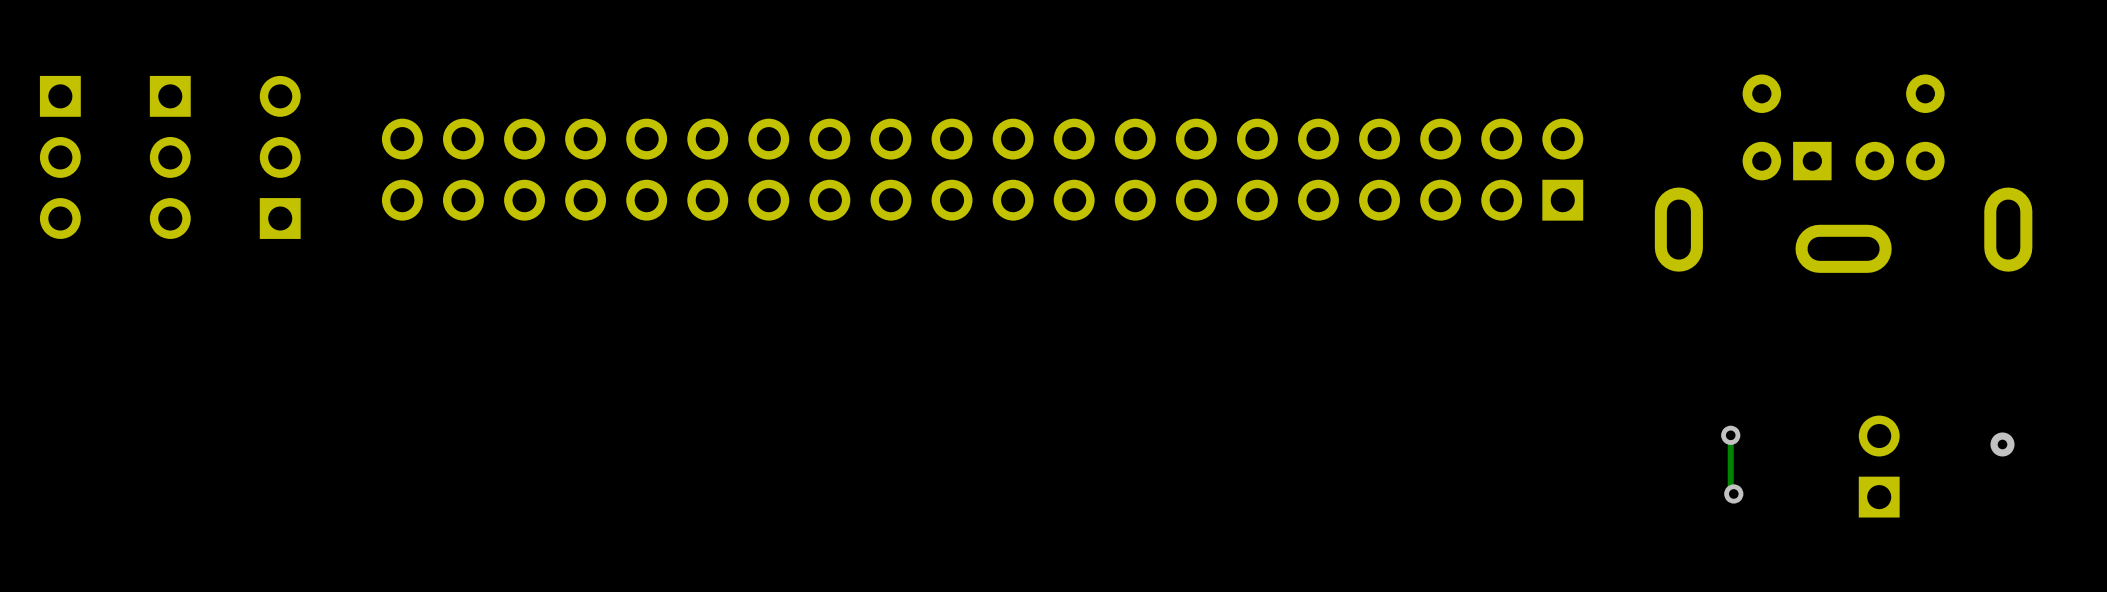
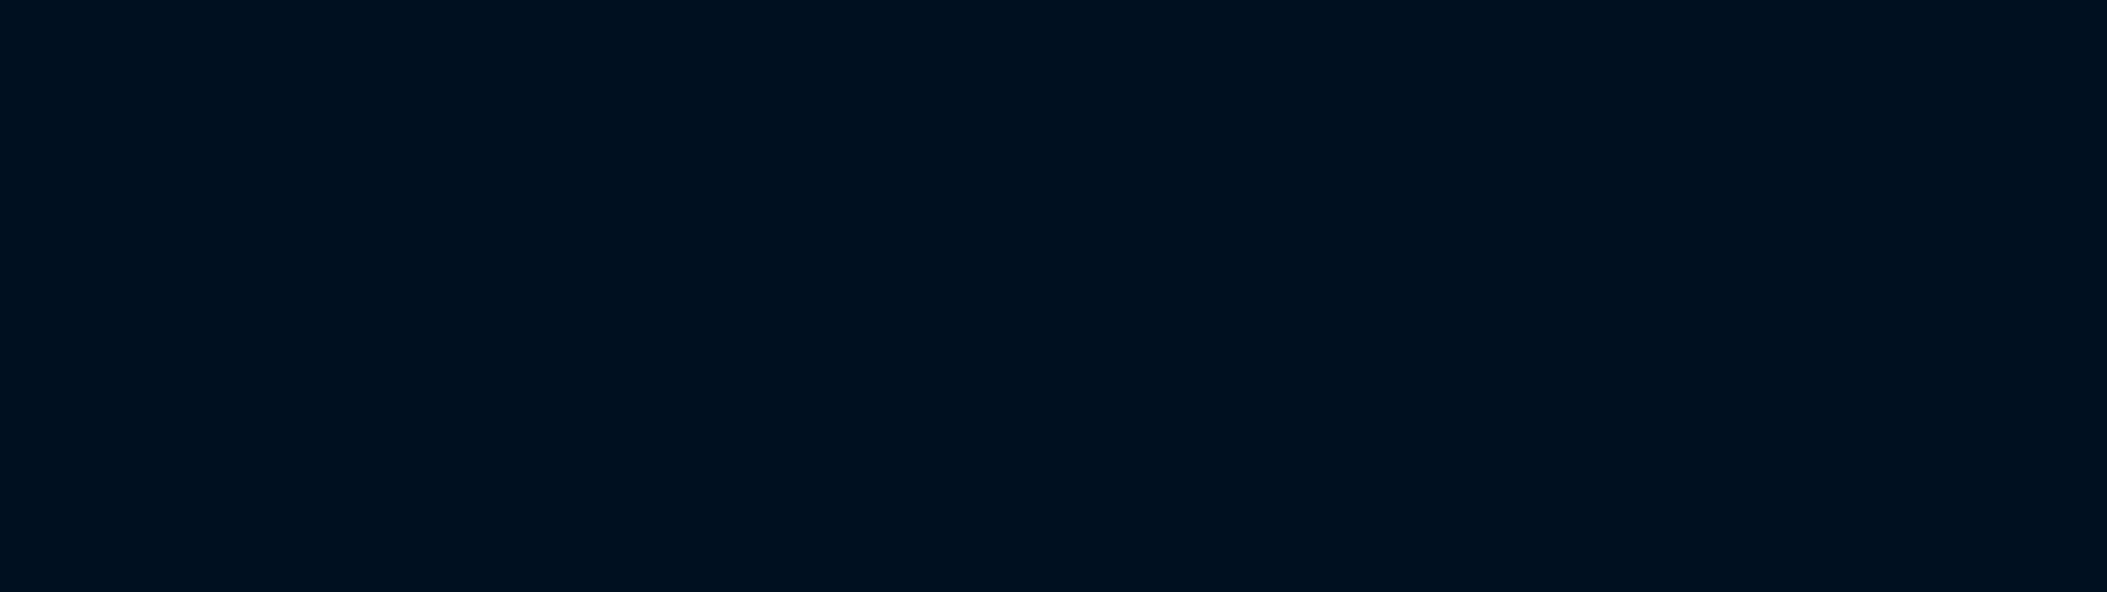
part: (60, 157) -> none
part: (170, 157) -> none
part: (280, 157) -> none
part: (982, 169) -> none
part: (1843, 173) -> none
track: (1730, 435) (1730, 490) (1733, 493) -> none
via: (1730, 435) -> none
via: (2002, 444) -> none
part: (1879, 466) -> none
via: (1733, 493) -> none

